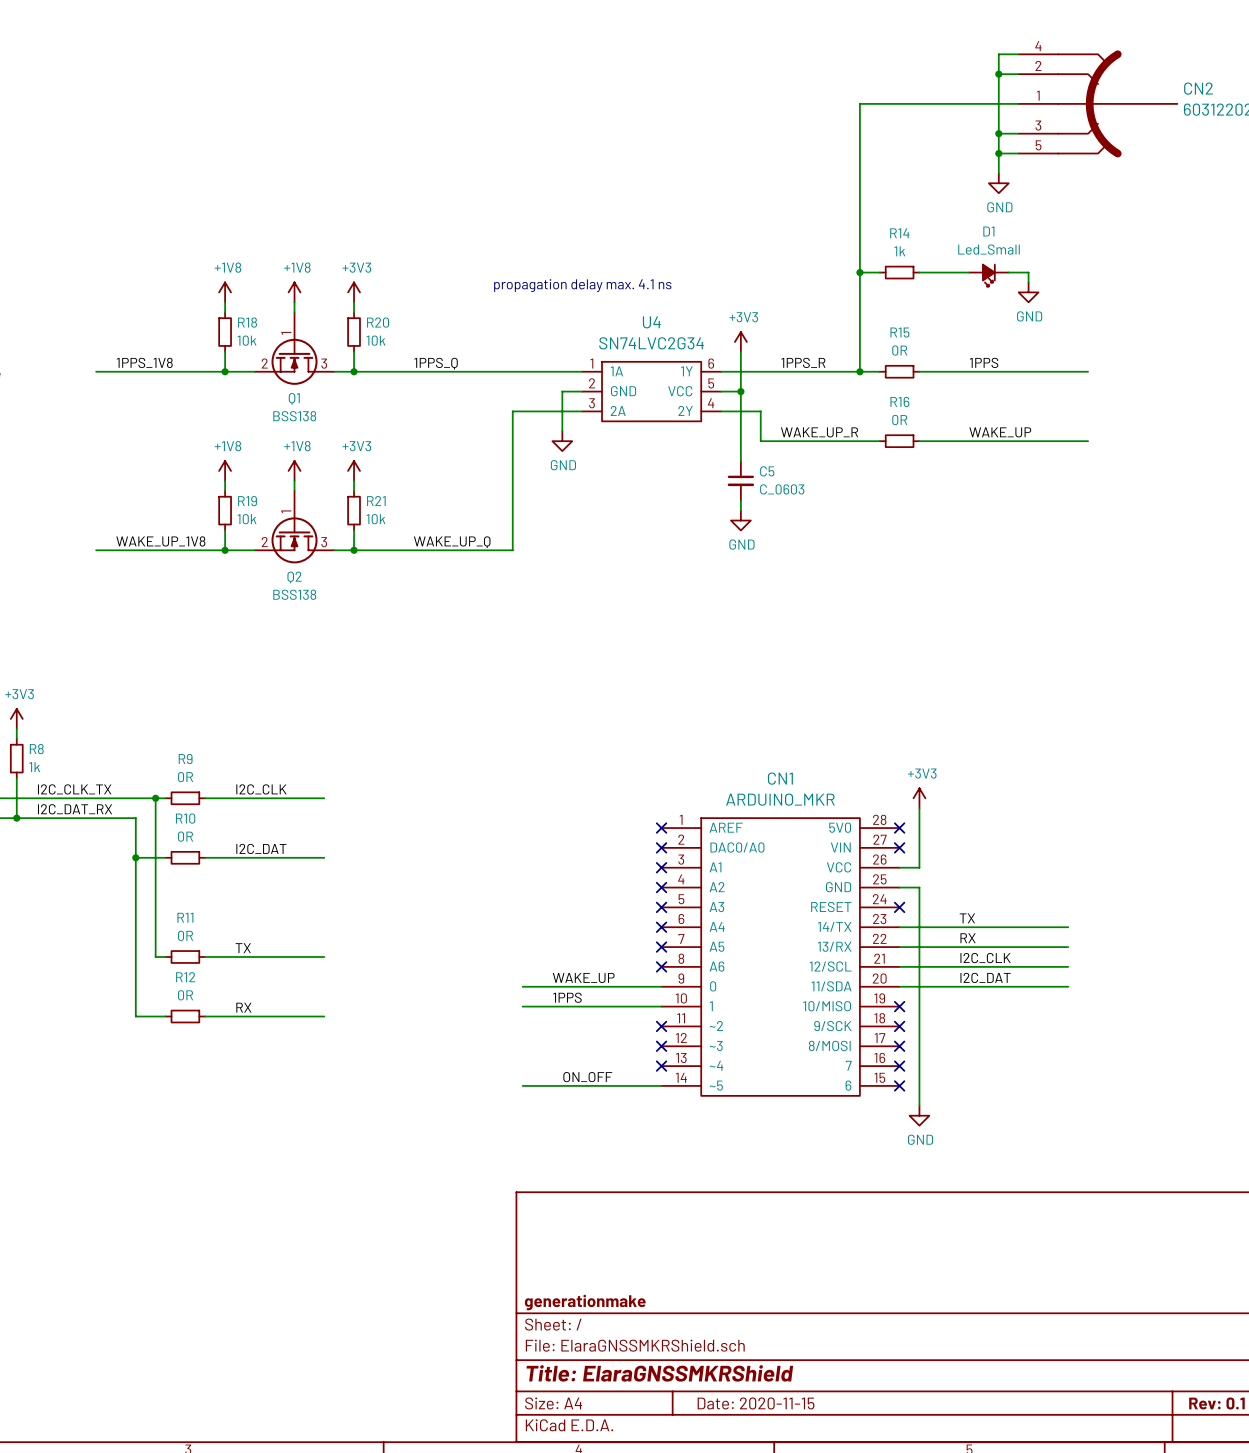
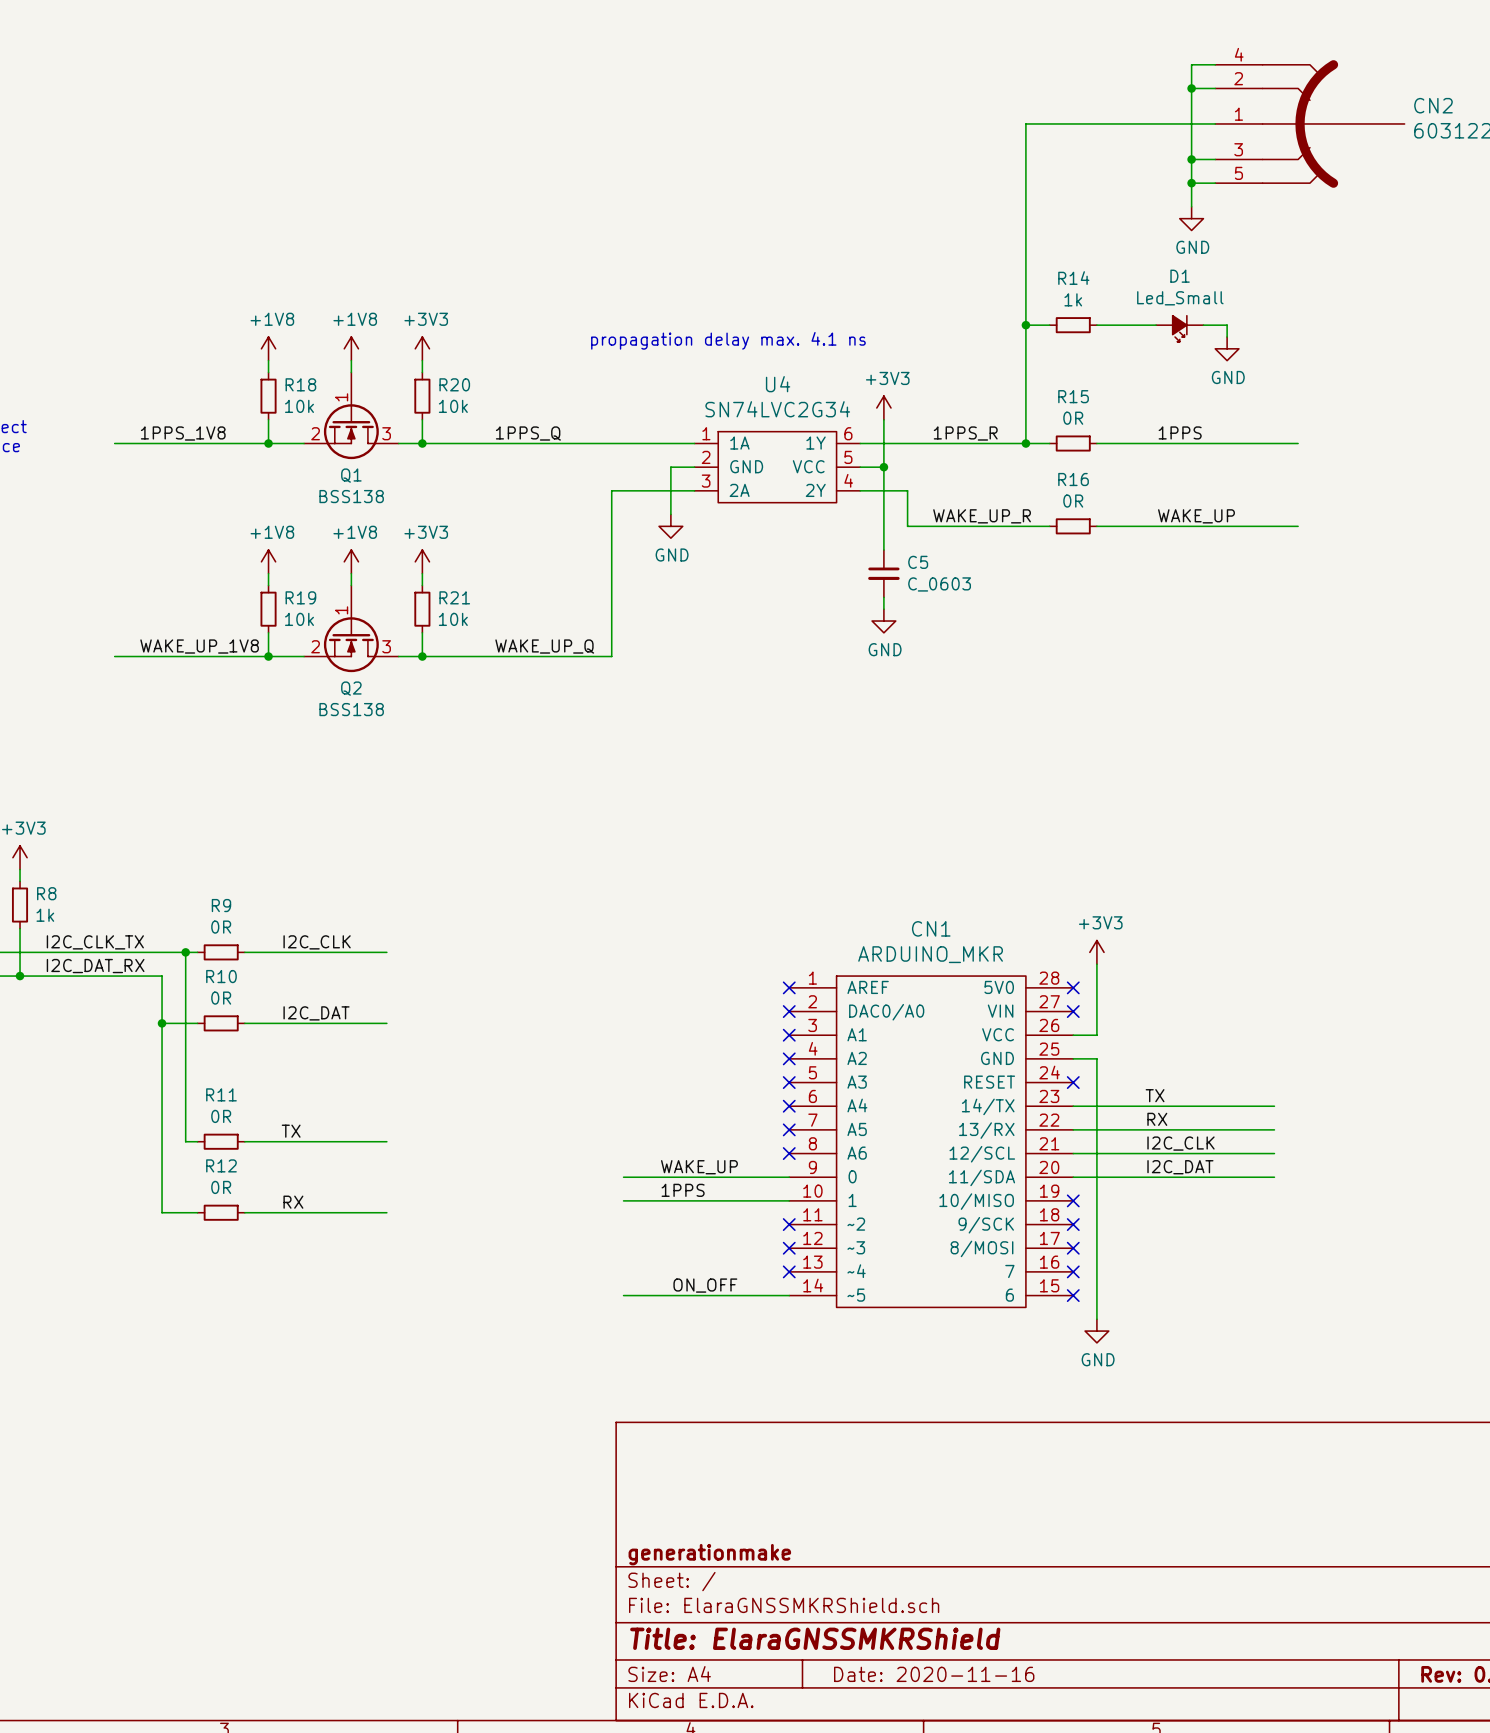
title block: Date: 2020-11-15 (756, 1403) -> Date: 2020-11-16 (934, 1674)

